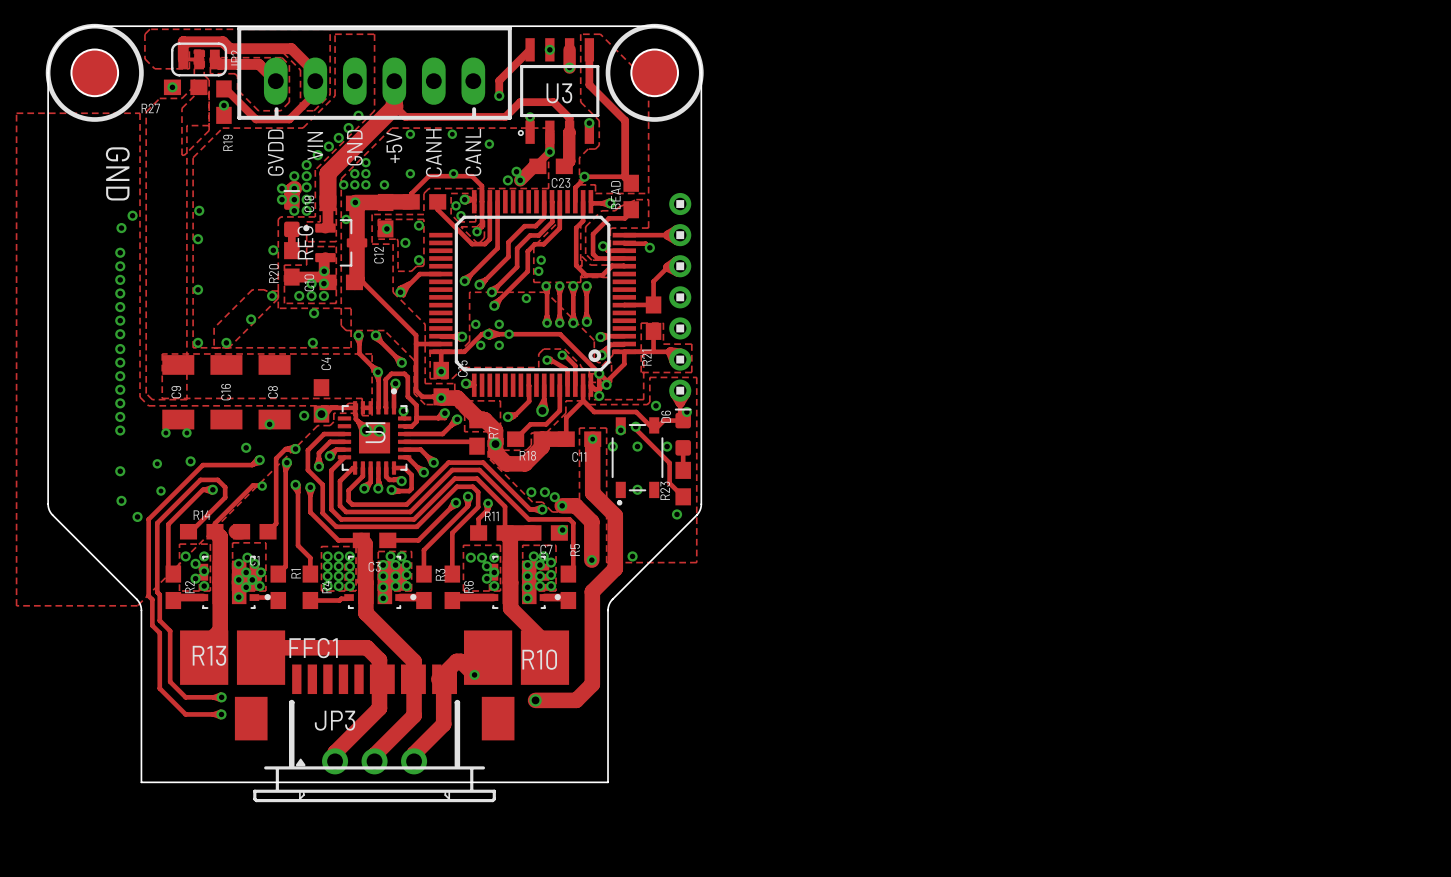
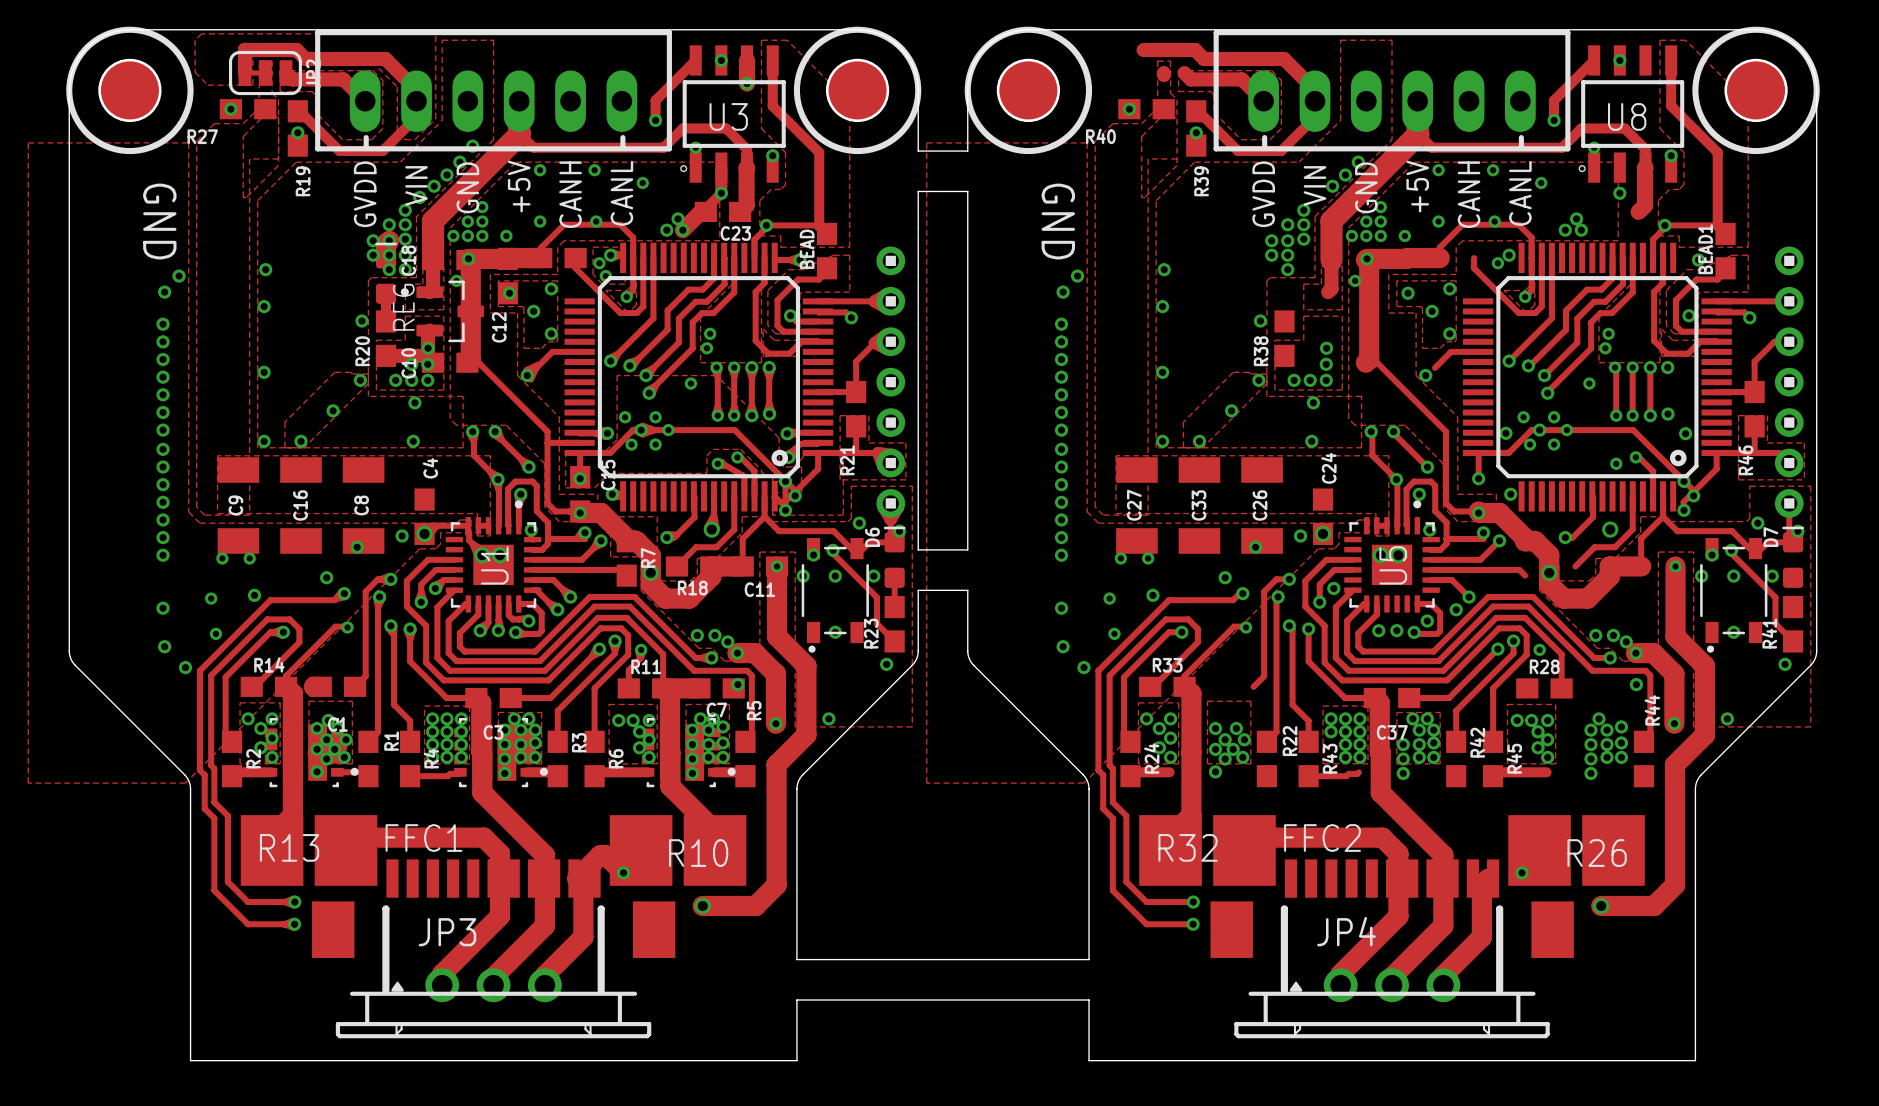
drawing: none -> [964, 26, 1093, 155]
drawing: none -> [1692, 26, 1820, 155]
zone outline: none -> (1340, 40) (1392, 40) (1392, 139) (1315, 216) (1315, 277) (1270, 277) (1266, 280) (1266, 396) (1361, 396) (1361, 447) (1156, 447) (1156, 200) (1194, 162) (1298, 162) (1340, 120) (1340, 40)
zone outline: none -> (1659, 40) (1685, 40) (1748, 102) (1748, 247) (1679, 247) (1679, 235) (1658, 235) (1658, 200) (1669, 189) (1679, 189) (1684, 184) (1684, 152) (1659, 128) (1659, 40)
track: none -> (1143, 50) (1195, 50) (1204, 59) (1284, 59) (1315, 89)
track: none -> (1594, 60) (1554, 100) (1554, 120)
via: none -> (1619, 60)
track: none -> (1671, 60) (1671, 106) (1717, 152) (1717, 226)
zone outline: none -> (1178, 70) (1178, 91) (1210, 91) (1213, 94) (1213, 112) (1241, 139) (1270, 139) (1281, 128) (1281, 80) (1271, 70) (1178, 70)
track: none -> (1163, 73) (1163, 75)
track: none -> (1184, 73) (1190, 79) (1241, 79) (1263, 101)
part: none -> (1028, 90)
part: none -> (1756, 90)
part: none -> (1392, 90)
track: none -> (1315, 101) (1315, 117) (1281, 150) (1238, 150) (1196, 111)
track: none -> (1417, 101) (1417, 133) (1432, 147) (1562, 147) (1581, 128) (1624, 128) (1645, 149) (1645, 205) (1638, 211)
via: none -> (1129, 109)
R40: none -> (1146, 109)
U8: none -> (1631, 114)
zone outline: none -> (1177, 117) (1160, 117) (1141, 136) (1141, 197) (1144, 197) (1177, 165) (1177, 99) (1170, 93) (1170, 61) (1157, 61) (1157, 107) (1141, 123) (1112, 123) (1095, 141) (1095, 507) (1103, 515) (1148, 515) (1148, 158) (1177, 158)
via: none -> (1554, 120)
R39: none -> (1196, 128)
via: none -> (1196, 132)
track: none -> (1418, 134) (1331, 221) (1331, 288) (1328, 292)
zone outline: none -> (926, 142) (926, 783) (1083, 783) (1318, 548) (1334, 548) (1339, 544) (1339, 532) (1369, 532) (1369, 519) (1358, 519) (1355, 523) (1098, 523) (1087, 511) (1087, 142) (926, 142)
via: none -> (1594, 147)
board edge: (701, 119) (701, 150) -> (918, 549) (967, 549) (967, 191) (918, 191)
via: none -> (1671, 155)
via: none -> (1358, 162)
zone outline: none -> (1414, 162) (1348, 227) (1348, 418) (1355, 425) (1404, 425) (1443, 463) (1443, 507) (1457, 521) (1496, 521) (1496, 494) (1457, 494) (1457, 417) (1416, 375) (1416, 312) (1388, 312) (1388, 274) (1456, 274) (1456, 247) (1462, 240) (1618, 240) (1618, 163) (1616, 162) (1414, 162)
via: none -> (1438, 170)
via: none -> (1493, 170)
via: none -> (1345, 175)
via: none -> (1541, 183)
text: none -> VIN (1315, 185)
via: none -> (1332, 186)
text: none -> GND (1366, 187)
text: none -> +5V (1417, 186)
text: none -> GVDD (1263, 194)
text: none -> CANH (1469, 194)
text: none -> CANL (1520, 193)
via: none -> (1619, 193)
via: none -> (1380, 207)
via: none -> (1303, 210)
via: none -> (1576, 218)
text: none -> GND (1058, 221)
via: none -> (1366, 221)
via: none -> (1380, 221)
via: none -> (1438, 221)
via: none -> (1494, 221)
via: none -> (1287, 224)
via: none -> (1303, 224)
via: none -> (1664, 225)
via: none -> (1565, 230)
via: none -> (1581, 230)
track: none -> (1725, 233) (1717, 225) (1667, 225) (1652, 239) (1652, 257)
via: none -> (1351, 235)
via: none -> (1366, 235)
via: none -> (1380, 235)
via: none -> (1404, 235)
via: none -> (1303, 239)
via: none -> (1271, 240)
via: none -> (1287, 240)
BEAD1: none -> (1725, 251)
via: none -> (1271, 255)
via: none -> (1287, 255)
via: none -> (1509, 255)
zone outline: none -> (1732, 255) (1748, 255) (1748, 292) (1700, 292) (1698, 293) (1698, 333) (1674, 333) (1666, 325) (1666, 290) (1687, 269) (1704, 269) (1709, 264) (1732, 255)
track: none -> (1541, 257) (1541, 306) (1535, 312) (1518, 312) (1474, 268) (1474, 258)
track: none -> (1551, 257) (1551, 318) (1509, 361)
track: none -> (1612, 257) (1612, 278) (1601, 289) (1587, 289) (1566, 310) (1566, 329) (1528, 365)
track: none -> (1622, 257) (1623, 284) (1605, 301) (1594, 301) (1577, 318) (1577, 342) (1544, 375)
track: none -> (1632, 257) (1632, 292) (1612, 313) (1600, 313) (1591, 322) (1591, 348) (1547, 393)
track: none -> (1663, 257) (1663, 283) (1654, 291) (1654, 340) (1666, 353) (1688, 353) (1700, 341) (1716, 341)
via: none -> (1367, 258)
via: none -> (1698, 260)
via: none -> (1497, 263)
zone outline: none -> (1321, 266) (1342, 266) (1342, 309) (1303, 309) (1303, 284) (1321, 284) (1321, 266)
track: none -> (1725, 268) (1725, 271) (1717, 279) (1696, 279) (1676, 300) (1676, 325) (1681, 331) (1716, 331)
via: none -> (1164, 269)
via: none -> (1287, 269)
via: none -> (1077, 276)
zone outline: none -> (1637, 277) (1659, 277) (1659, 362) (1598, 362) (1598, 316) (1637, 277)
via: none -> (1355, 280)
zone outline: none -> (1396, 280) (1396, 306) (1420, 306) (1422, 308) (1422, 348) (1440, 348) (1446, 341) (1454, 341) (1456, 340) (1456, 280) (1396, 280)
zone outline: none -> (1533, 282) (1534, 282) (1534, 304) (1526, 312) (1504, 290) (1525, 290) (1533, 282)
via: none -> (1449, 288)
via: none -> (1063, 292)
via: none -> (1408, 293)
track: none -> (1525, 296) (1531, 290) (1531, 237) (1518, 224) (1462, 224) (1439, 247) (1439, 258) (1365, 260) (1369, 263) (1369, 359) (1365, 362) (1377, 362) (1446, 431) (1446, 503) (1454, 511) (1499, 512) (1525, 538) (1525, 541) (1535, 541) (1549, 555) (1549, 584) (1563, 598) (1587, 598) (1609, 576) (1609, 566) (1641, 566) (1641, 538) (1663, 516) (1663, 496)
via: none -> (1525, 296)
track: none -> (1716, 301) (1789, 301)
via: none -> (1162, 306)
via: none -> (1432, 311)
track: none -> (1716, 311) (1744, 312) (1749, 317)
zone outline: none -> (1303, 316) (1303, 340) (1274, 340) (1274, 389) (1342, 389) (1342, 316) (1303, 316)
via: none -> (1689, 315)
via: none -> (1749, 317)
via: none -> (1260, 321)
via: none -> (1061, 324)
zone outline: none -> (1661, 329) (1661, 356) (1696, 356) (1696, 348) (1701, 343) (1701, 340) (1672, 340) (1661, 329)
via: none -> (1449, 333)
via: none -> (1608, 333)
R38: none -> (1284, 338)
via: none -> (1061, 341)
track: none -> (1789, 341) (1774, 341) (1754, 361) (1754, 392) (1716, 392)
via: none -> (1326, 348)
via: none -> (1605, 348)
track: none -> (1478, 351) (1450, 351) (1434, 367)
via: none -> (1061, 359)
via: none -> (1509, 361)
via: none -> (1326, 364)
via: none -> (1528, 365)
track: none -> (1615, 367) (1616, 415)
via: none -> (1615, 367)
track: none -> (1632, 367) (1632, 415)
via: none -> (1632, 367)
track: none -> (1650, 367) (1650, 415)
via: none -> (1650, 367)
via: none -> (1667, 367)
via: none -> (1162, 372)
zone outline: none -> (1266, 373) (1233, 372) (1183, 422) (1183, 447)
via: none -> (1425, 375)
via: none -> (1544, 375)
via: none -> (1061, 377)
part: none -> (1597, 377)
via: none -> (1258, 380)
via: none -> (1294, 380)
via: none -> (1310, 380)
via: none -> (1326, 380)
part: none -> (1789, 382)
zone outline: none -> (1266, 383) (1202, 447)
via: none -> (1589, 383)
via: none -> (1547, 393)
via: none -> (1061, 394)
via: none -> (1313, 402)
R46: none -> (1754, 409)
via: none -> (1231, 410)
via: none -> (1061, 412)
via: none -> (1667, 414)
via: none -> (1616, 415)
via: none -> (1632, 415)
via: none -> (1650, 415)
zone outline: none -> (1738, 415) (1767, 415) (1767, 442) (1804, 442) (1804, 479) (1738, 479) (1738, 415)
via: none -> (1523, 417)
via: none -> (1554, 417)
track: none -> (1754, 426) (1754, 452)
via: none -> (1061, 430)
via: none -> (1539, 430)
via: none -> (1566, 430)
track: none -> (1371, 431) (1372, 455) (1397, 480) (1397, 525)
via: none -> (1371, 431)
track: none -> (1393, 431) (1427, 467)
via: none -> (1393, 431)
via: none -> (1505, 433)
via: none -> (1685, 433)
via: none -> (1162, 441)
via: none -> (1199, 441)
via: none -> (1311, 441)
via: none -> (1530, 444)
via: none -> (1554, 444)
via: none -> (1061, 449)
zone outline: none -> (1116, 455) (1388, 455) (1388, 536) (1375, 536) (1375, 513) (1116, 513) (1116, 455)
track: none -> (1635, 457) (1639, 457) (1652, 471) (1652, 496)
via: none -> (1635, 457)
track: none -> (1789, 463) (1779, 452) (1716, 452) (1716, 469) (1683, 502)
via: none -> (1616, 463)
via: none -> (1061, 467)
via: none -> (1427, 467)
track: none -> (1478, 477) (1478, 452) (1508, 452) (1531, 430) (1633, 430) (1694, 491)
via: none -> (1478, 478)
via: none -> (1396, 479)
via: none -> (1684, 481)
via: none -> (1061, 484)
zone outline: none -> (1749, 486) (1810, 486) (1810, 726) (1693, 726) (1693, 552) (1658, 552) (1658, 661) (1623, 661) (1610, 648) (1597, 648) (1539, 590) (1539, 564) (1558, 564) (1558, 580) (1589, 580) (1595, 574) (1595, 558) (1615, 558) (1640, 532) (1640, 516) (1665, 516) (1669, 521) (1746, 521) (1749, 518) (1749, 486)
via: none -> (1419, 494)
via: none -> (1510, 494)
via: none -> (1693, 495)
track: none -> (1592, 496) (1592, 517) (1572, 537) (1565, 537)
track: none -> (1632, 496) (1632, 529) (1615, 547) (1594, 547) (1575, 566)
via: none -> (1061, 502)
track: none -> (1789, 503) (1789, 538) (1793, 542) (1768, 542) (1755, 554) (1732, 531) (1677, 531) (1663, 516)
C27: none -> (1136, 505)
C33: none -> (1199, 505)
C26: none -> (1262, 505)
via: none -> (1684, 510)
via: none -> (1478, 513)
C24: none -> (1323, 516)
via: none -> (1061, 519)
via: none -> (1757, 523)
track: none -> (1376, 525) (1386, 525)
track: none -> (1407, 525) (1406, 489) (1414, 481) (1430, 481) (1435, 485) (1435, 511) (1446, 522) (1446, 543) (1440, 550) (1431, 549)
via: none -> (1610, 529)
via: none -> (1429, 530)
via: none -> (1797, 531)
track: none -> (1483, 532) (1483, 539) (1446, 539)
via: none -> (1483, 532)
via: none -> (1323, 533)
via: none -> (1300, 536)
via: none -> (1061, 537)
via: none -> (1565, 537)
track: none -> (1499, 540) (1480, 559) (1431, 559)
via: none -> (1499, 540)
via: none -> (1255, 547)
board edge: (701, 426) (701, 457) -> (796, 959) (1089, 959) (1087, 781) (970, 661) (967, 650) (967, 590) (918, 590)
track: none -> (1731, 550) (1731, 553) (1775, 597) (1775, 623) (1793, 641)
via: none -> (1731, 550)
via: none -> (1061, 555)
via: none -> (1380, 555)
via: none -> (1398, 555)
via: none -> (1712, 555)
U5: none -> (1392, 556)
via: none -> (1120, 558)
via: none -> (1148, 558)
D7: none -> (1793, 557)
track: none -> (1352, 559) (1326, 559) (1305, 580) (1305, 606) (1324, 625) (1324, 662) (1342, 680) (1447, 680) (1499, 628) (1519, 628) (1526, 635) (1526, 654) (1493, 688) (1493, 741)
track: none -> (1675, 566) (1675, 636) (1704, 665) (1704, 734) (1675, 764) (1675, 885) (1654, 905) (1601, 905)
via: none -> (1675, 566)
track: none -> (1352, 569) (1334, 569) (1319, 584) (1319, 602)
track: none -> (1431, 569) (1519, 569) (1525, 575)
via: none -> (1549, 572)
via: none -> (1701, 576)
via: none -> (1733, 576)
via: none -> (1772, 576)
via: none -> (1225, 577)
track: none -> (1289, 579) (1276, 579) (1264, 591) (1264, 676) (1253, 686)
via: none -> (1289, 579)
track: none -> (1431, 580) (1451, 580) (1469, 597)
via: none -> (1333, 588)
track: none -> (1352, 590) (1335, 607) (1335, 657) (1348, 670) (1443, 670) (1496, 617) (1525, 617) (1561, 654) (1561, 688)
track: none -> (1242, 593) (1239, 593) (1233, 600) (1169, 600) (1098, 670) (1098, 770) (1103, 775) (1103, 808) (1112, 818) (1112, 890) (1146, 924) (1193, 924)
via: none -> (1242, 593)
via: none -> (1152, 595)
part: none -> (1733, 595)
track: none -> (1278, 596) (1276, 598) (1276, 732) (1266, 741)
via: none -> (1278, 596)
via: none -> (1469, 597)
via: none -> (1109, 598)
via: none -> (1319, 602)
track: none -> (1366, 603) (1364, 603) (1347, 621) (1347, 653) (1355, 661) (1438, 661) (1493, 606) (1528, 606) (1592, 670) (1645, 670) (1650, 675) (1650, 741) (1643, 741)
track: none -> (1376, 603) (1376, 614) (1358, 633) (1358, 646) (1363, 651) (1433, 651) (1488, 596) (1533, 596) (1594, 657) (1610, 657)
track: none -> (1417, 603) (1431, 603) (1440, 613) (1440, 631) (1437, 633) (1414, 632)
via: none -> (1061, 608)
via: none -> (1456, 609)
via: none -> (1427, 621)
R41: none -> (1793, 624)
track: none -> (1289, 625) (1292, 629) (1292, 704) (1308, 720) (1308, 741)
via: none -> (1289, 625)
track: none -> (1246, 627) (1233, 626) (1184, 676) (1184, 686) (1191, 693) (1191, 815) (1170, 836) (1170, 850)
via: none -> (1246, 627)
track: none -> (1308, 629) (1308, 661) (1345, 698) (1374, 698) (1379, 702) (1380, 792) (1443, 855) (1443, 925) (1392, 977) (1392, 985)
via: none -> (1308, 629)
via: none -> (1378, 630)
via: none -> (1396, 630)
track: none -> (1181, 632) (1169, 632) (1124, 677) (1124, 735) (1130, 741)
via: none -> (1181, 632)
via: none -> (1414, 632)
via: none -> (1733, 632)
via: none -> (1114, 633)
via: none -> (1595, 635)
via: none -> (1613, 635)
track: none -> (1513, 641) (1513, 653) (1456, 710) (1456, 741)
via: none -> (1513, 641)
via: none -> (1626, 641)
via: none -> (1063, 646)
track: none -> (1497, 649) (1448, 698) (1409, 698)
via: none -> (1497, 649)
via: none -> (1539, 649)
track: none -> (1635, 653) (1653, 653) (1674, 673) (1674, 723)
via: none -> (1635, 653)
via: none -> (1610, 657)
via: none -> (1785, 664)
via: none -> (1083, 667)
via: none -> (1636, 684)
track: none -> (1150, 686) (1153, 686) (1197, 642) (1197, 629) (1188, 619) (1165, 619) (1109, 675) (1109, 765) (1112, 768) (1112, 802) (1126, 815) (1126, 881) (1146, 902) (1193, 902)
R33: none -> (1167, 686)
R28: none -> (1544, 688)
C37: none -> (1392, 698)
zone outline: none -> (1207, 701) (1250, 701) (1250, 763) (1207, 763) (1207, 701)
zone outline: none -> (1138, 702) (1178, 702) (1178, 763) (1138, 763) (1138, 702)
zone outline: none -> (1507, 704) (1555, 704) (1555, 763) (1507, 763) (1507, 704)
zone outline: none -> (1323, 706) (1367, 706) (1367, 763) (1323, 763) (1323, 706)
zone outline: none -> (1396, 712) (1440, 712) (1440, 763) (1396, 763) (1396, 712)
via: none -> (1146, 718)
via: none -> (1170, 718)
via: none -> (1331, 718)
via: none -> (1345, 718)
via: none -> (1359, 718)
via: none -> (1412, 718)
via: none -> (1427, 718)
via: none -> (1598, 718)
via: none -> (1727, 718)
via: none -> (1517, 720)
via: none -> (1531, 720)
via: none -> (1547, 720)
via: none -> (1674, 723)
via: none -> (1621, 726)
via: none -> (1159, 728)
via: none -> (1215, 728)
via: none -> (1236, 728)
via: none -> (1419, 730)
via: none -> (1433, 730)
via: none -> (1590, 730)
via: none -> (1607, 730)
via: none -> (1331, 731)
via: none -> (1345, 731)
via: none -> (1359, 731)
via: none -> (1538, 731)
via: none -> (1170, 738)
via: none -> (1225, 739)
via: none -> (1244, 739)
via: none -> (1547, 739)
via: none -> (1433, 742)
via: none -> (1621, 742)
via: none -> (1345, 744)
via: none -> (1359, 744)
via: none -> (1403, 744)
via: none -> (1419, 744)
via: none -> (1590, 744)
via: none -> (1607, 744)
via: none -> (1159, 747)
via: none -> (1538, 747)
via: none -> (1215, 749)
via: none -> (1233, 749)
via: none -> (1170, 757)
via: none -> (1242, 757)
via: none -> (1345, 757)
via: none -> (1359, 757)
via: none -> (1419, 757)
via: none -> (1433, 757)
via: none -> (1547, 757)
via: none -> (1607, 757)
via: none -> (1621, 757)
R24: none -> (1130, 759)
via: none -> (1225, 759)
R22: none -> (1266, 759)
R43: none -> (1308, 759)
via: none -> (1403, 759)
R42: none -> (1456, 759)
R45: none -> (1493, 759)
via: none -> (1590, 759)
R44: none -> (1643, 759)
track: none -> (1169, 772) (1134, 772) (1130, 776)
via: none -> (1215, 771)
track: none -> (1358, 772) (1348, 773) (1346, 776) (1308, 776)
track: none -> (1546, 772) (1496, 772) (1493, 776)
via: none -> (1403, 773)
via: none -> (1590, 773)
R32: none -> (1207, 850)
track: none -> (1244, 850) (1257, 837) (1382, 837) (1398, 853) (1398, 916) (1340, 974) (1340, 985)
R26: none -> (1576, 850)
via: none -> (1521, 872)
track: none -> (1488, 878) (1481, 884) (1481, 937) (1443, 975) (1443, 985)
via: none -> (1193, 902)
via: none -> (1601, 905)
via: none -> (1193, 924)
FFC2: none -> (1392, 948)
board edge: (608, 741) (608, 772) -> (918, 151) (967, 151) (967, 90) (972, 67) (980, 53) (991, 42) (1005, 34) (1020, 30) (1756, 29) (1771, 31) (1786, 37) (1798, 47) (1808, 60) (1814, 74) (1816, 90) (1816, 653) (1810, 665) (1701, 774) (1696, 783) (1695, 1060) (1089, 1060) (1089, 1000) (796, 1000)
JP4: none -> (1392, 985)
board edge: (141, 782) (608, 782) -> (190, 1012) (190, 1060) (796, 1060) (796, 1012)

